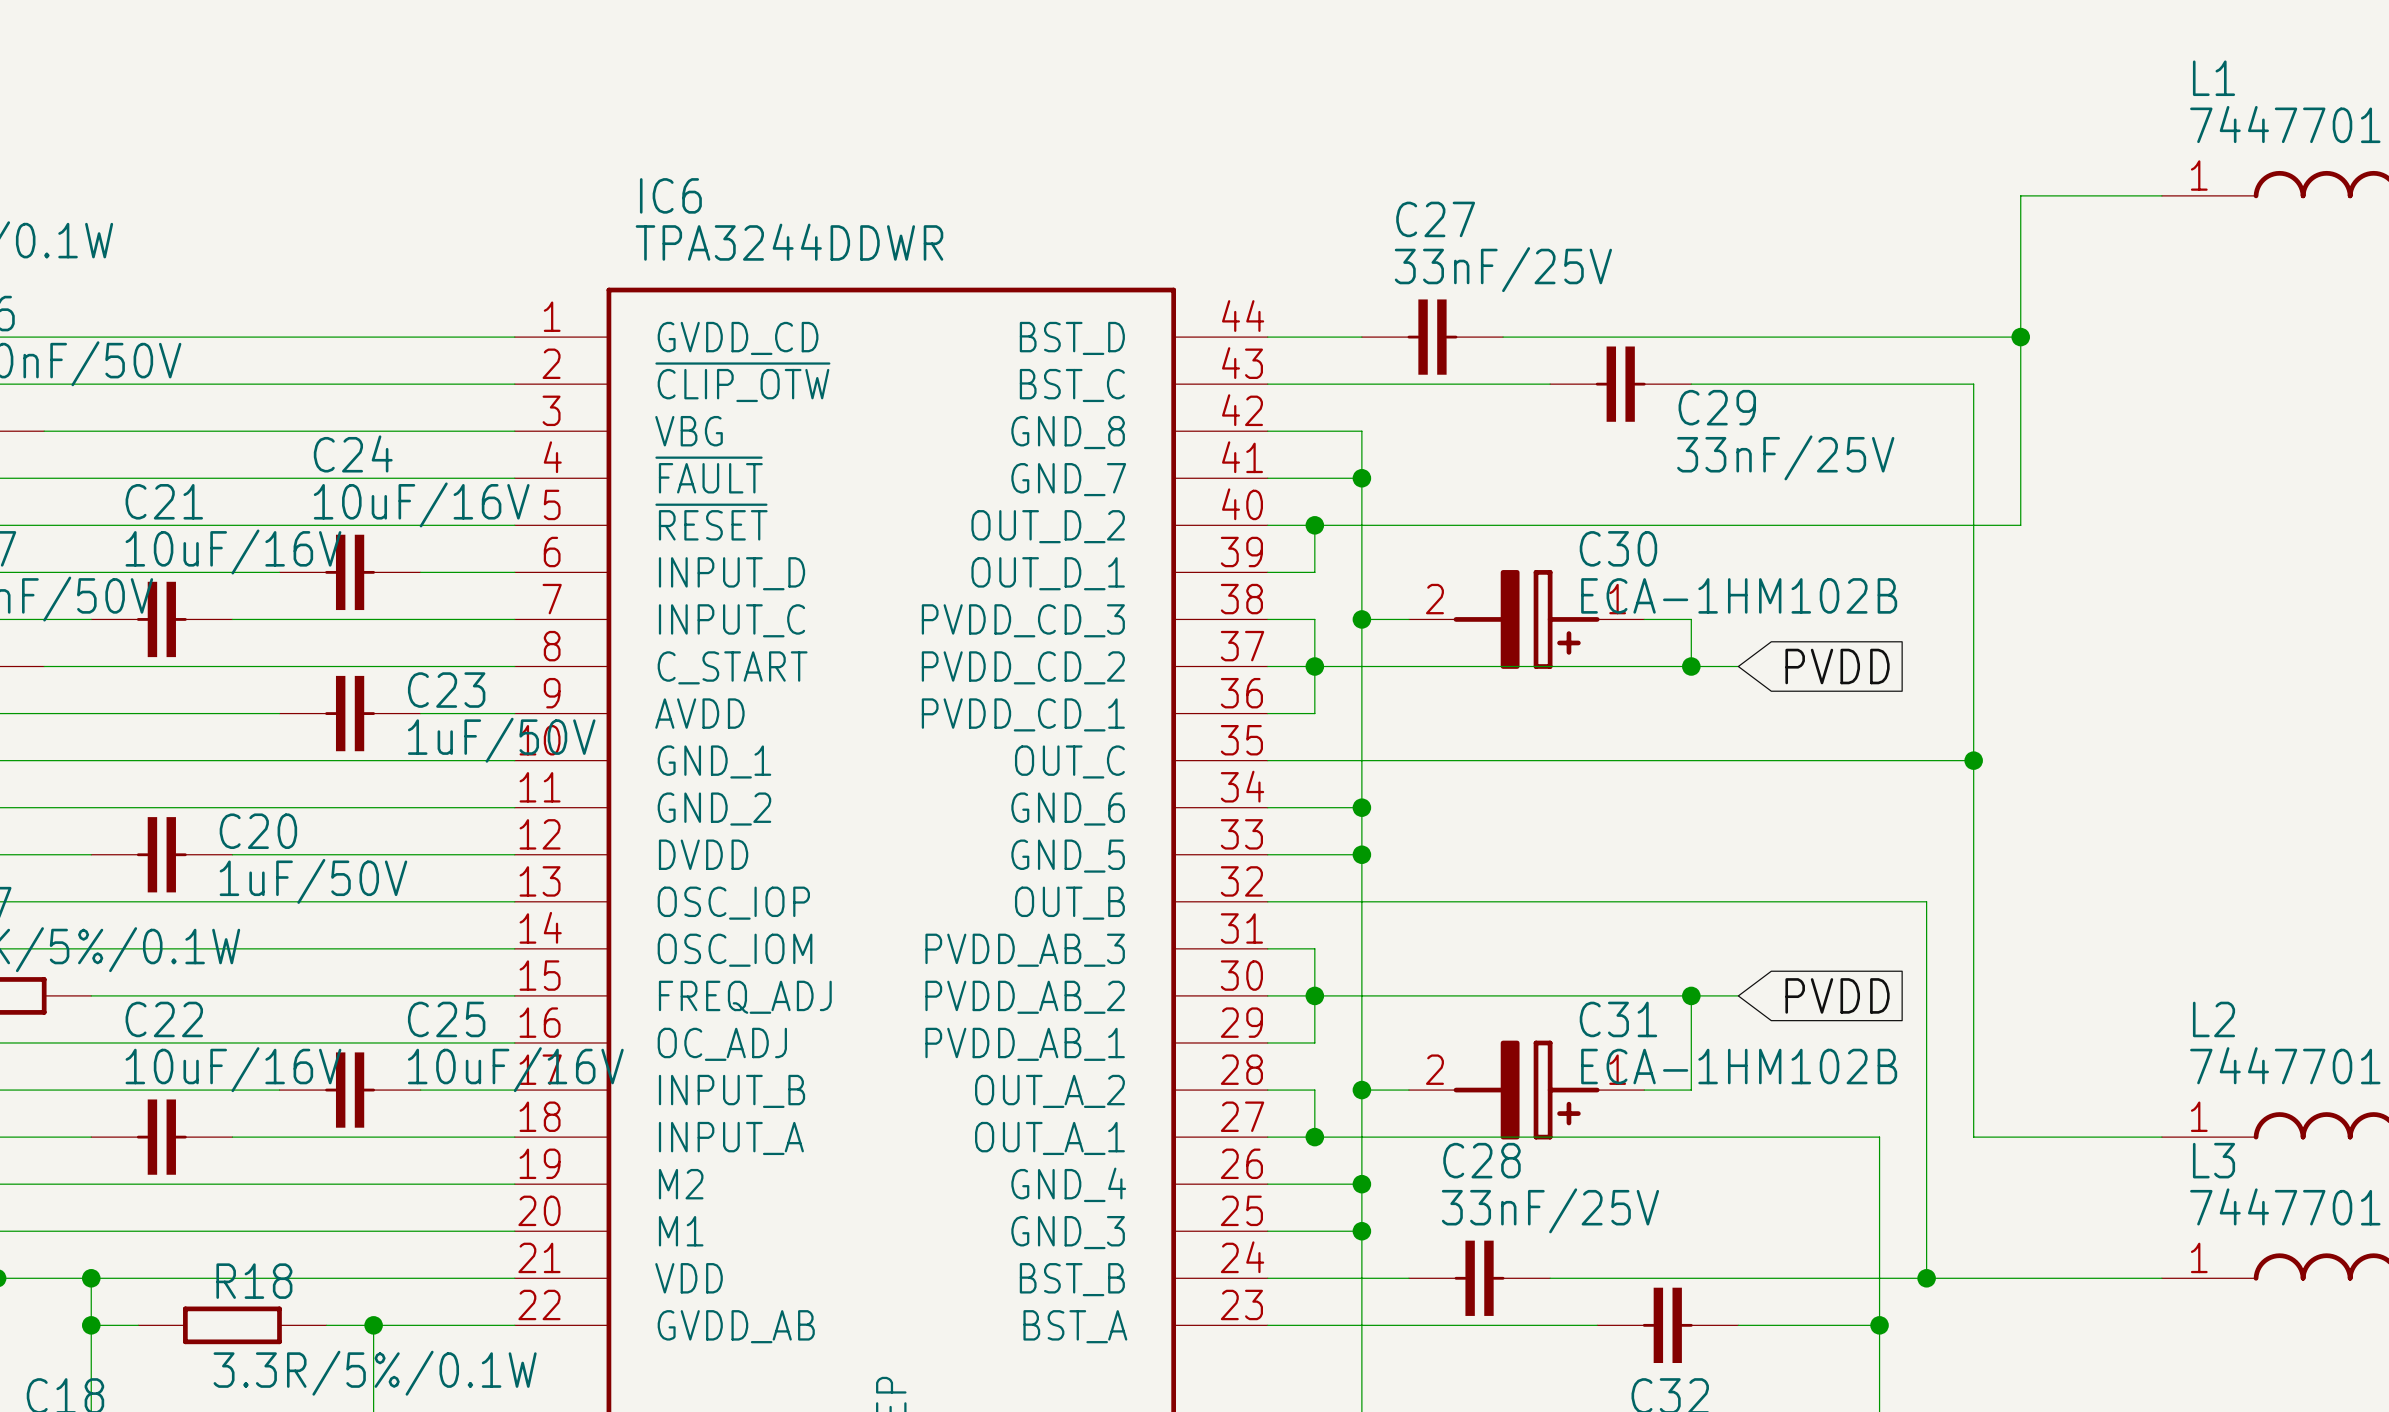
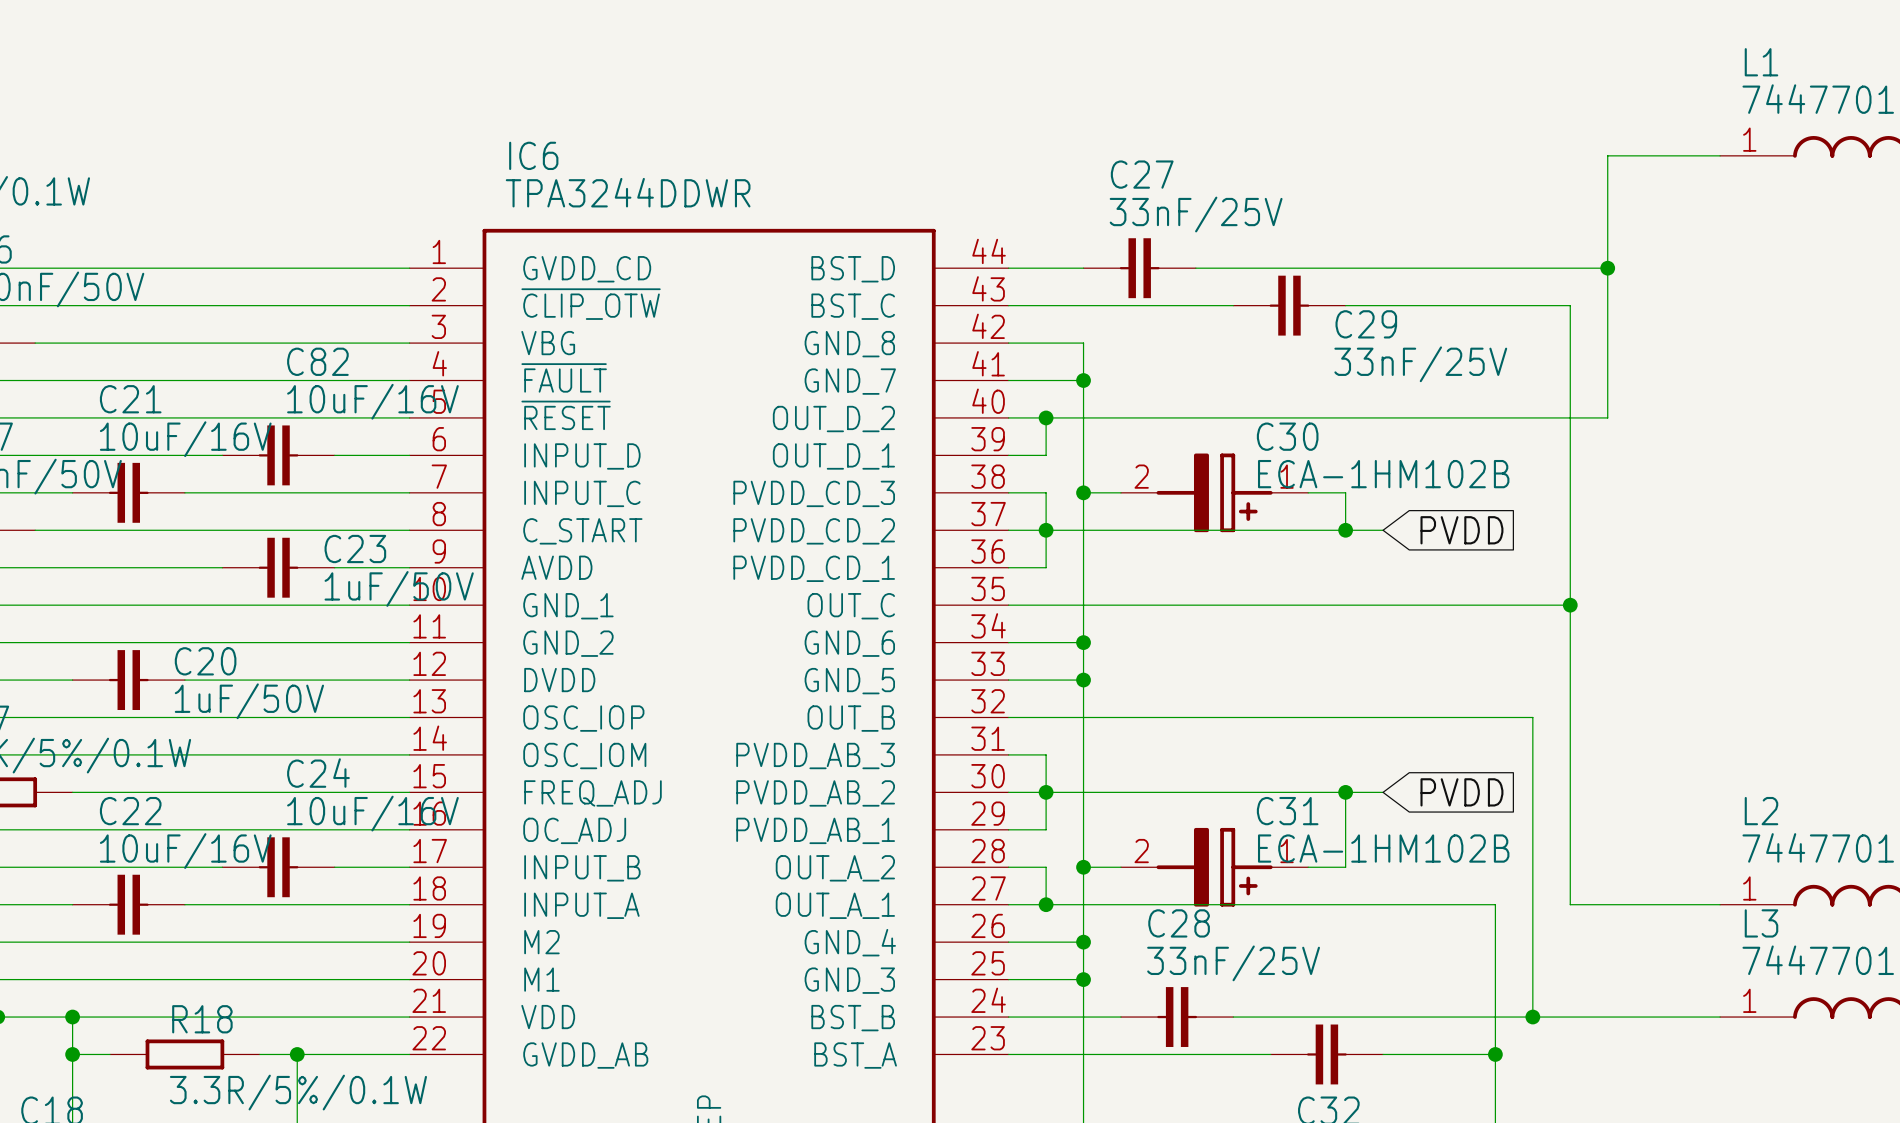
C24 name: C24 (353, 453) -> C82 (317, 361)
C24 value position: 10uF/16V (421, 504) -> 10uF/16V (372, 401)
C25 name: C25 (446, 1019) -> C24 (318, 773)
C25 value position: 10uF/16V (515, 1069) -> 10uF/16V (372, 813)

